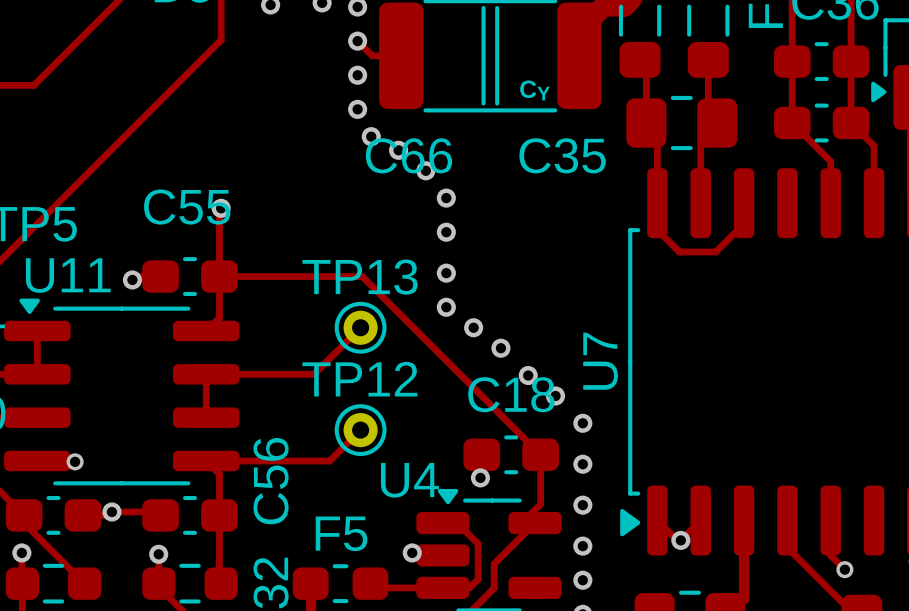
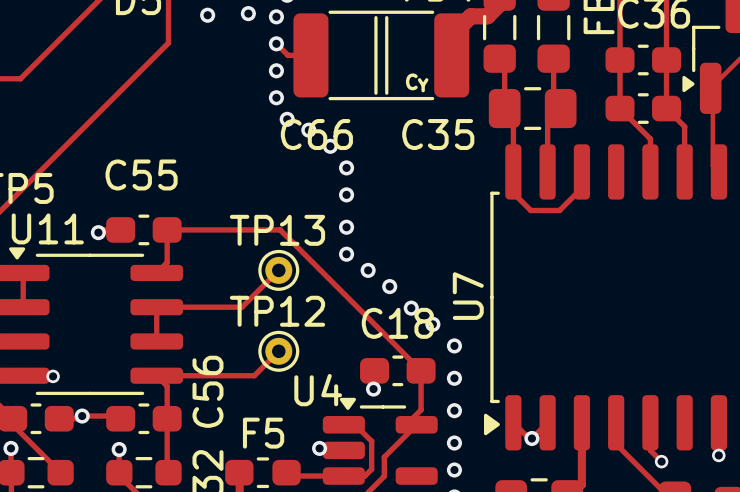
track: (221, 208) (219, 210) (219, 276) -> none
via: (221, 208) -> none

